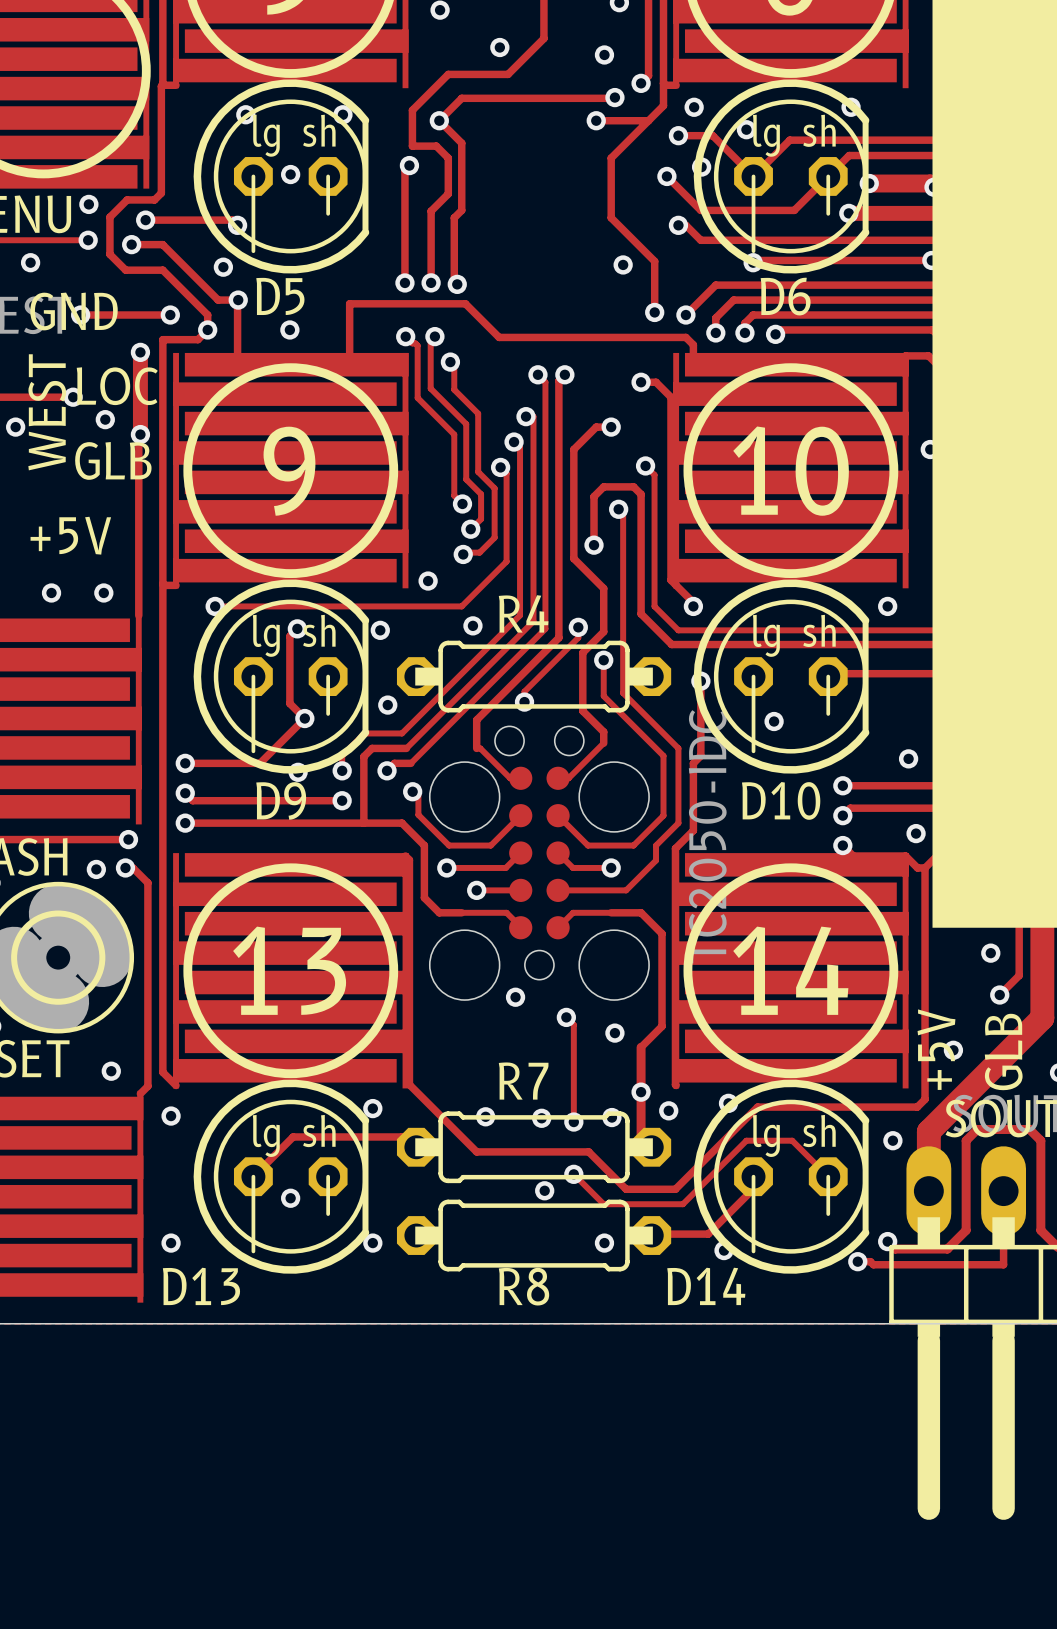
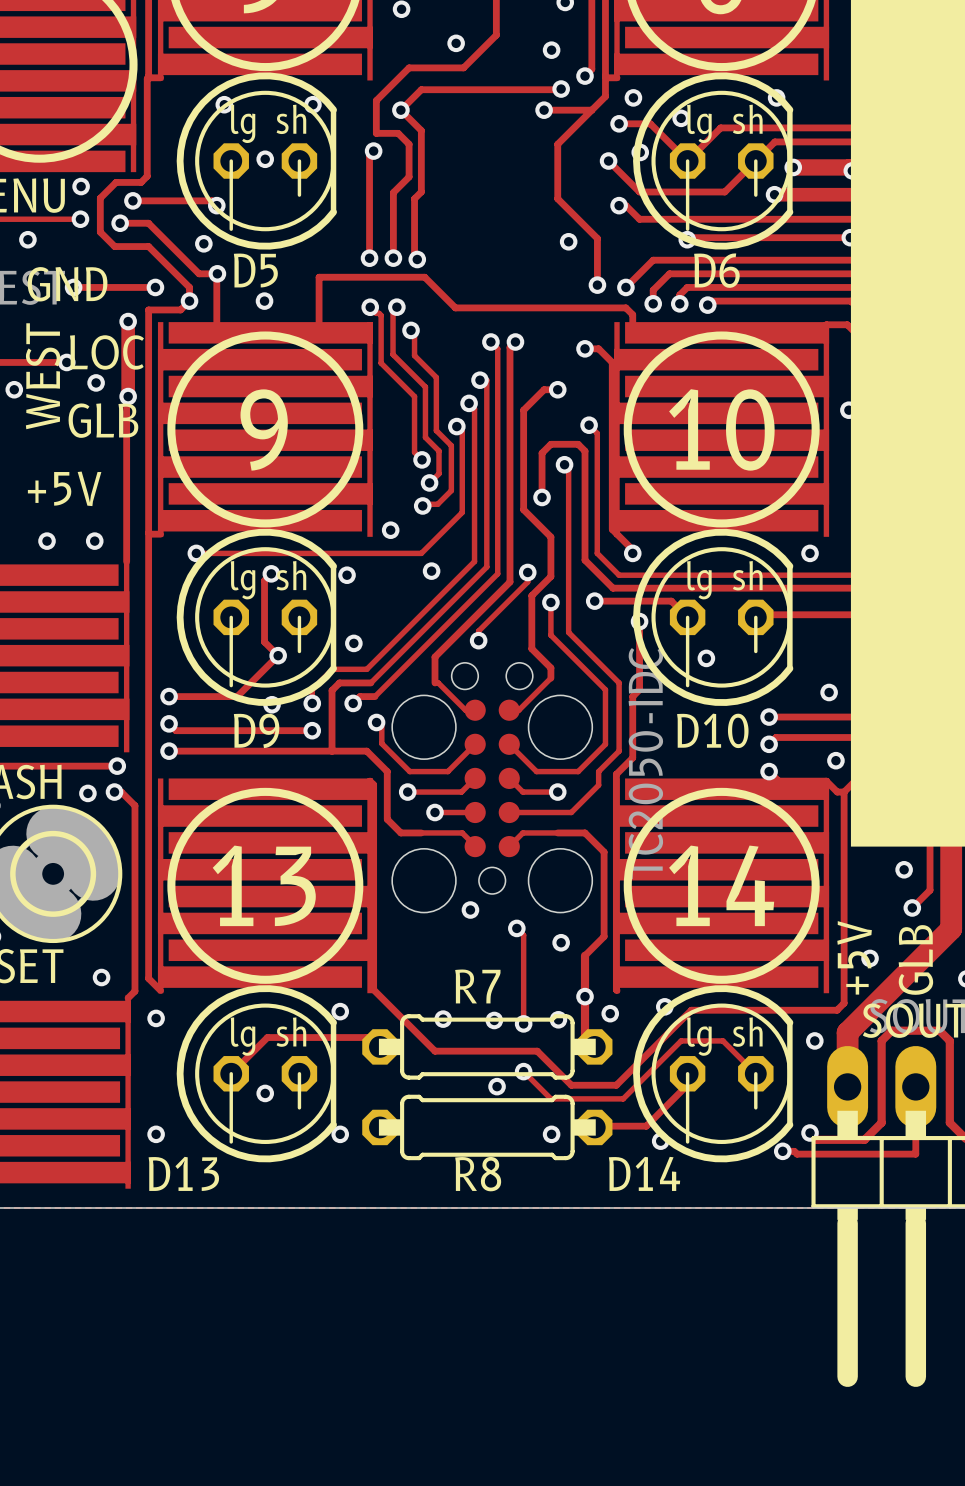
track: none -> (594, 601) (671, 601) (687, 617)
via: none -> (594, 601)
R4: (534, 676) -> none

